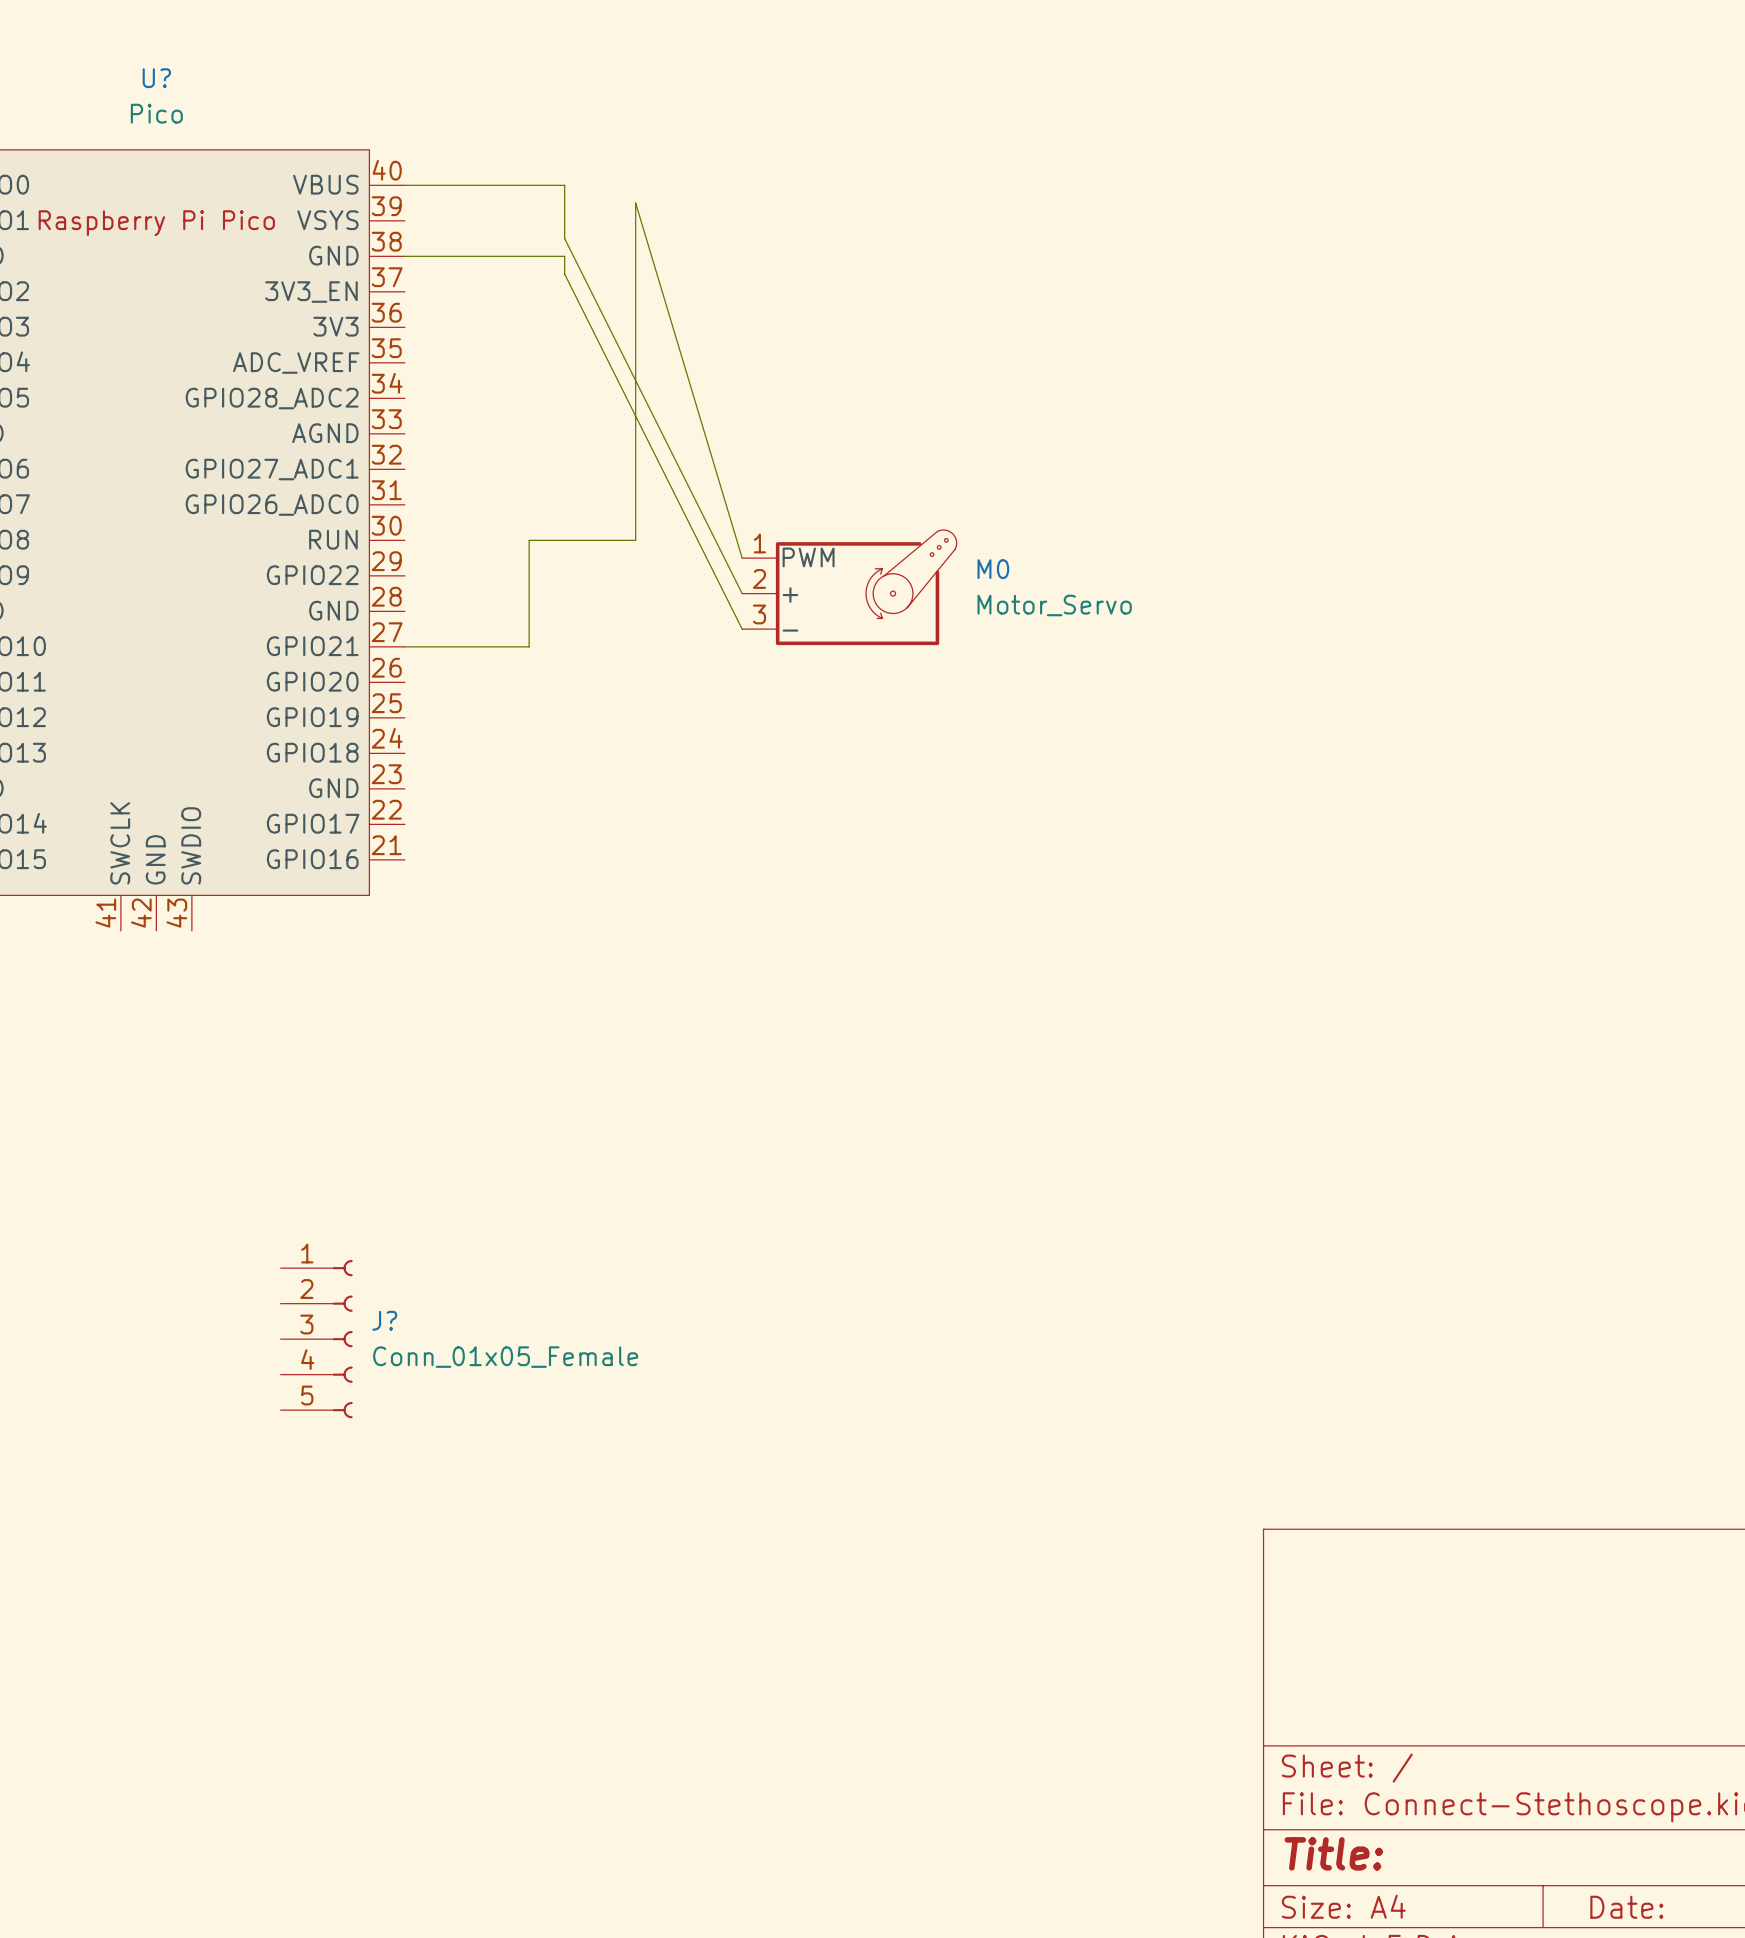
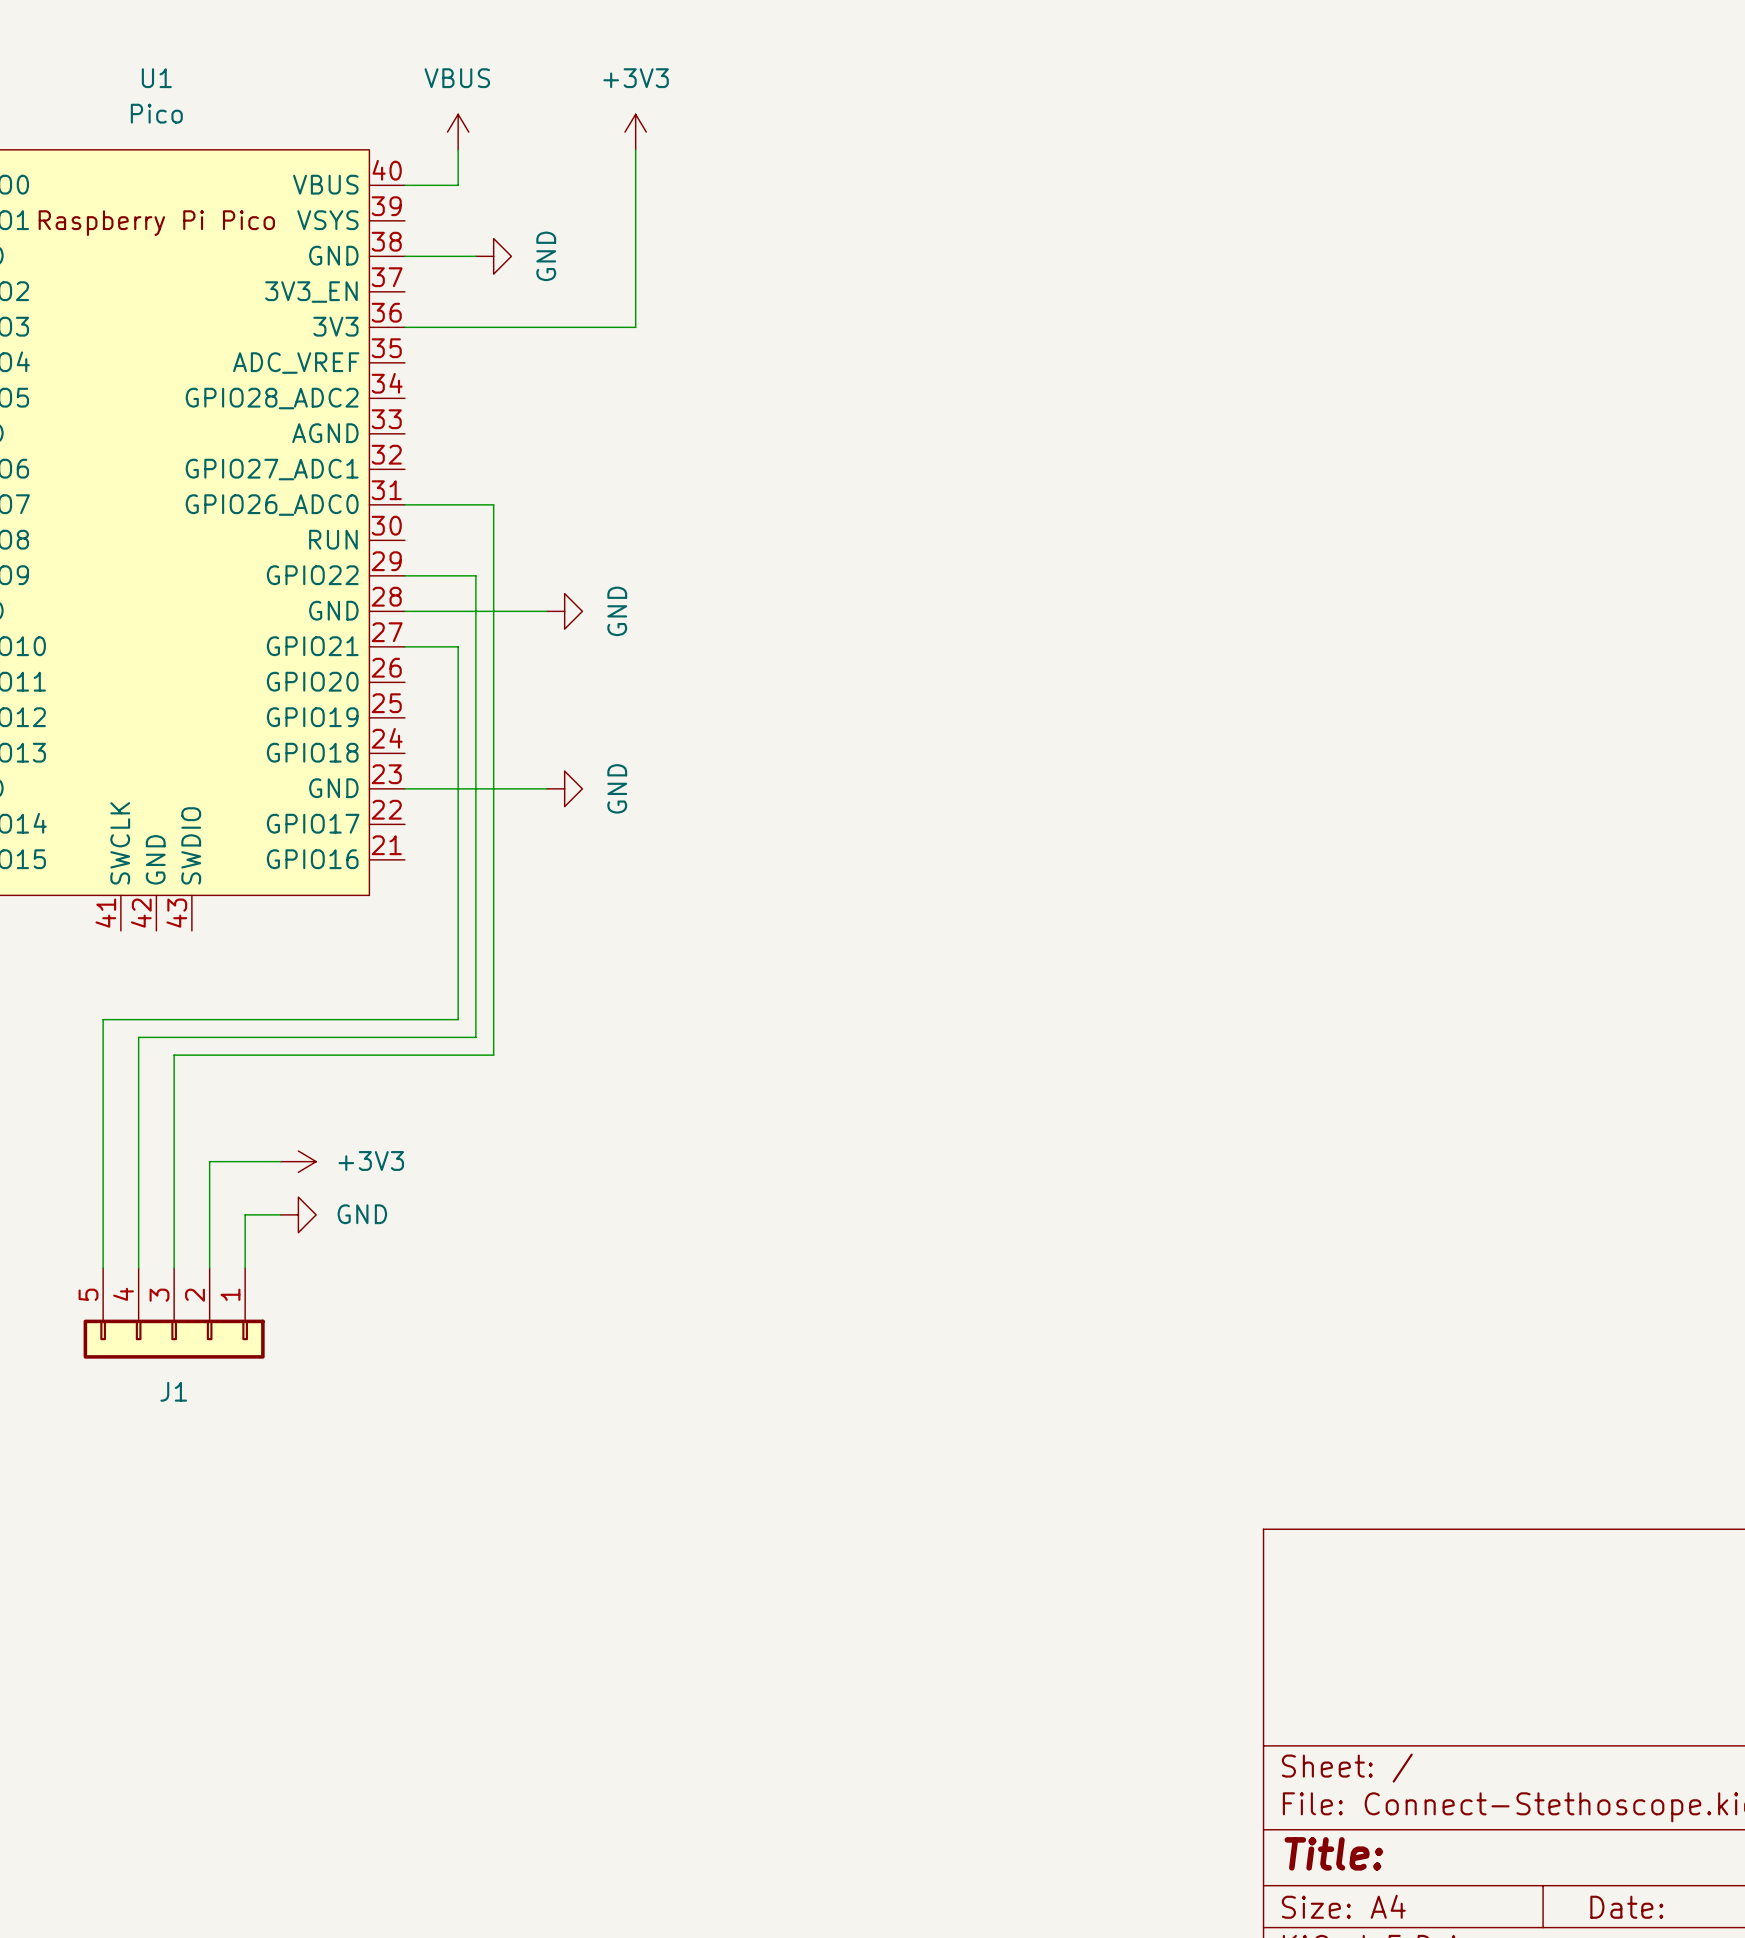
U? name: U? (156, 78) -> U1 (156, 78)
power symbol: none -> VBUS (458, 132)
power symbol: none -> +3V3 (635, 132)
wire: (458, 185) (564, 185) (564, 238) (742, 593) -> (458, 185) (458, 149)
wire: (635, 203) (742, 558) -> (635, 203) (635, 149)
wire: (475, 256) (564, 256) (564, 274) (742, 629) -> none
power symbol: none -> GND (493, 256)
wire: (635, 327) (635, 540) (529, 540) (529, 646) (458, 646) -> (635, 327) (404, 327)
wire: none -> (404, 504) (493, 504) (493, 1055) (174, 1055) (174, 1268)
wire: none -> (404, 575) (475, 575) (475, 1037) (138, 1037) (138, 1268)
M0: Motor_Servo (849, 587) -> none
wire: none -> (404, 611) (546, 611)
power symbol: none -> GND (564, 611)
wire: none -> (458, 646) (458, 1019) (103, 1019) (103, 1268)
wire: none -> (404, 788) (546, 788)
power symbol: none -> GND (564, 788)
wire: none -> (280, 1161) (209, 1161) (209, 1268)
power symbol: none -> +3V3 (298, 1161)
wire: none -> (280, 1214) (245, 1214) (245, 1268)
power symbol: none -> GND (298, 1214)
J1: none -> (174, 1313)
J?: Conn_01x05_Female (316, 1339) -> none

